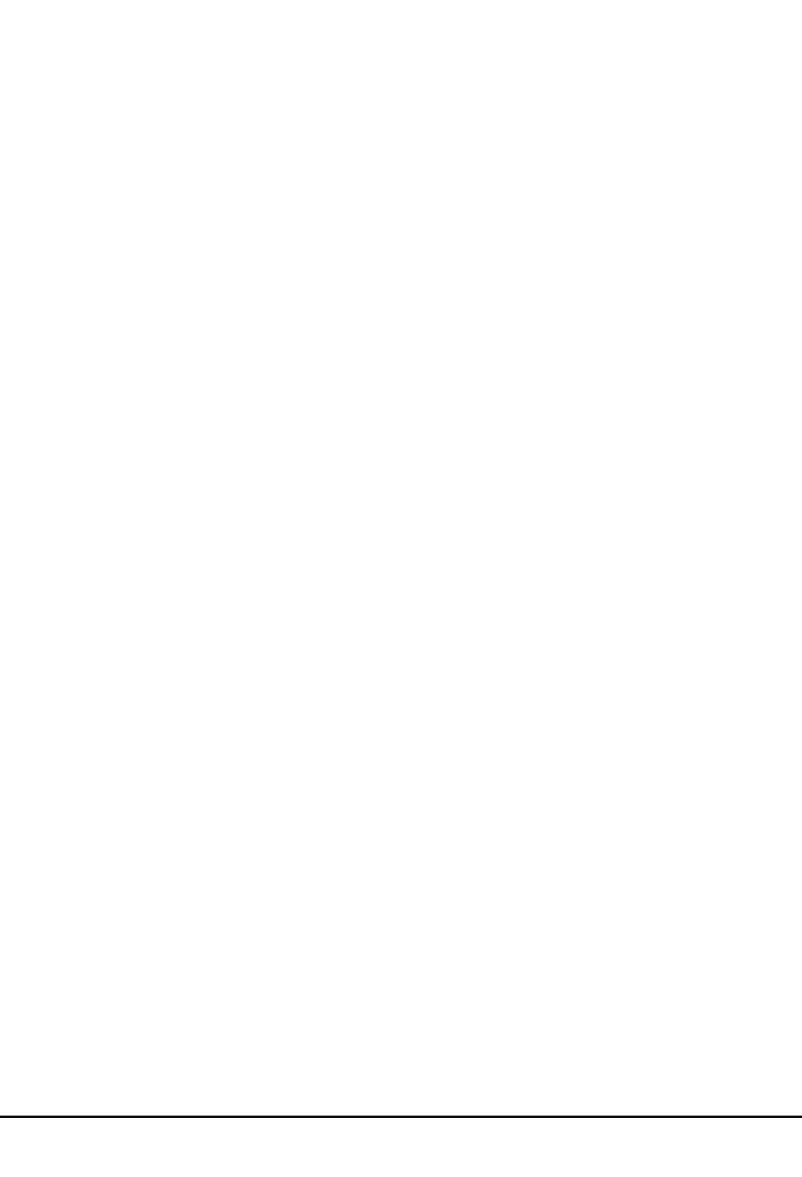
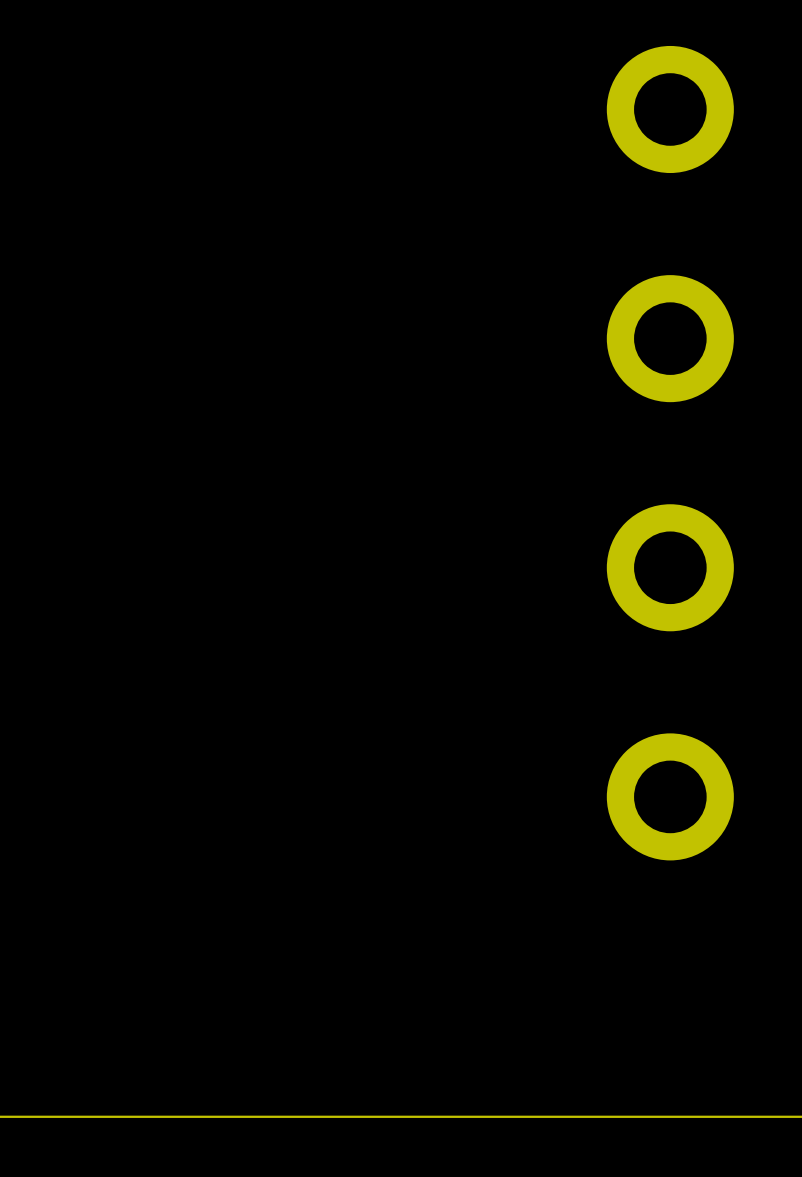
part: none -> (670, 109)
part: none -> (670, 338)
part: none -> (670, 567)
part: none -> (670, 796)

